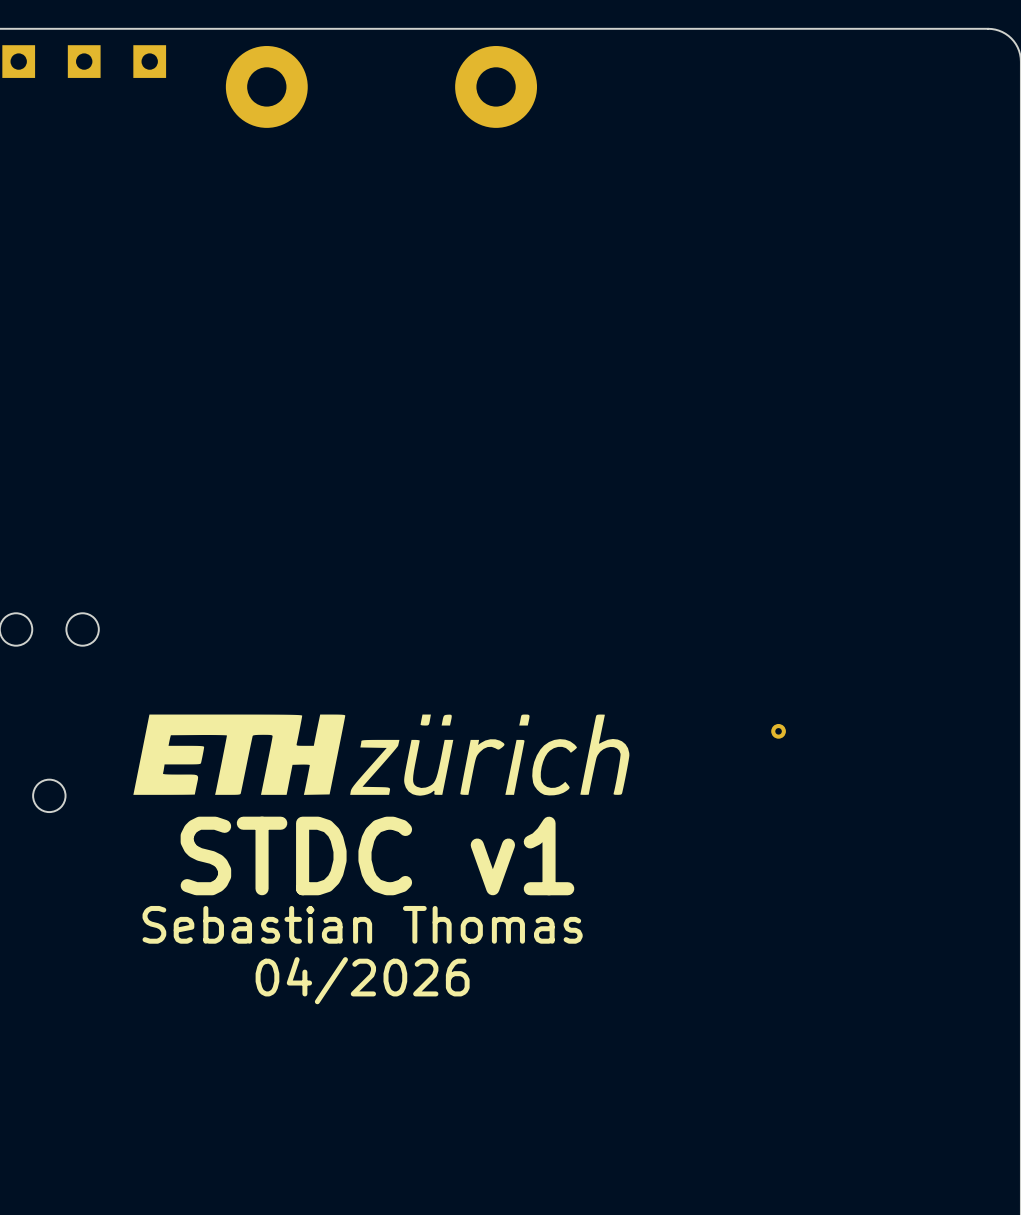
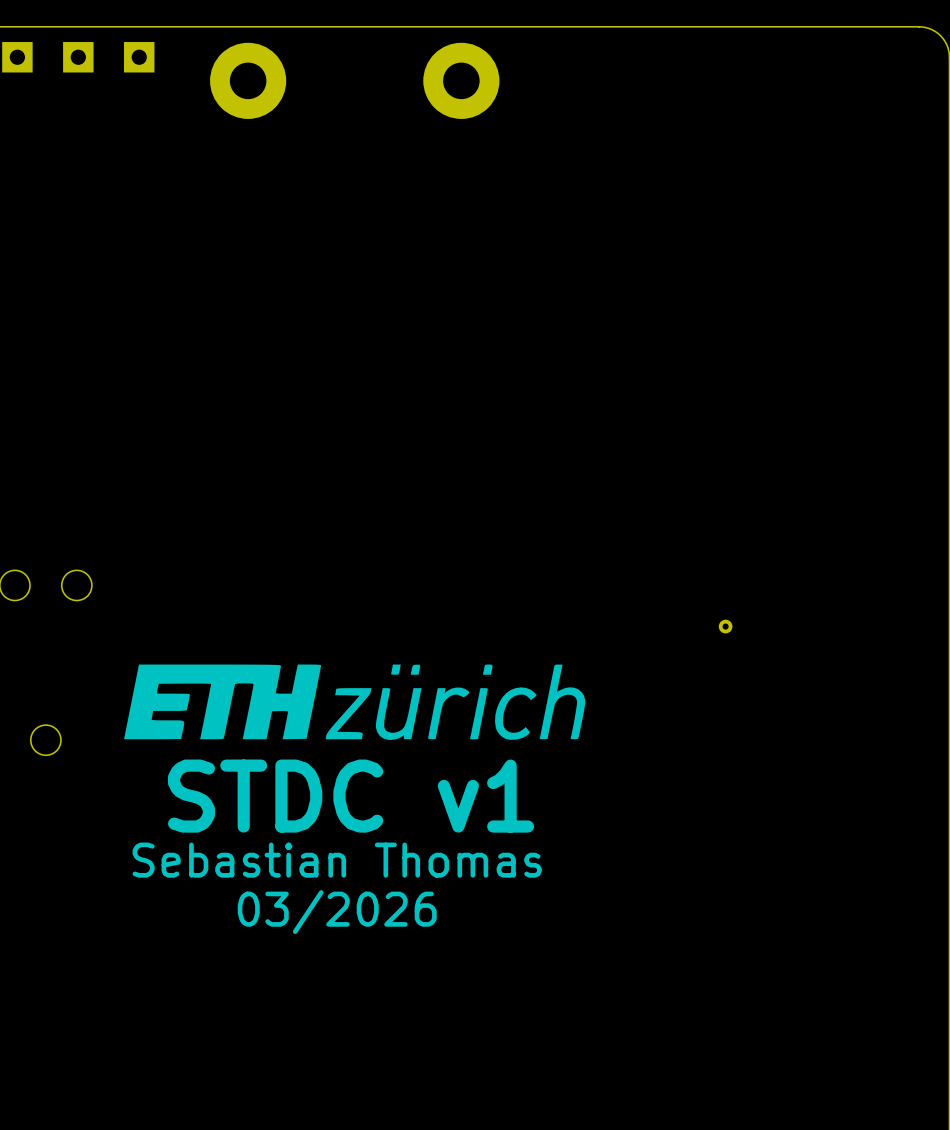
part position: (778, 731) -> (725, 626)
text: 04/2026 (362, 980) -> 03/2026 (337, 912)

